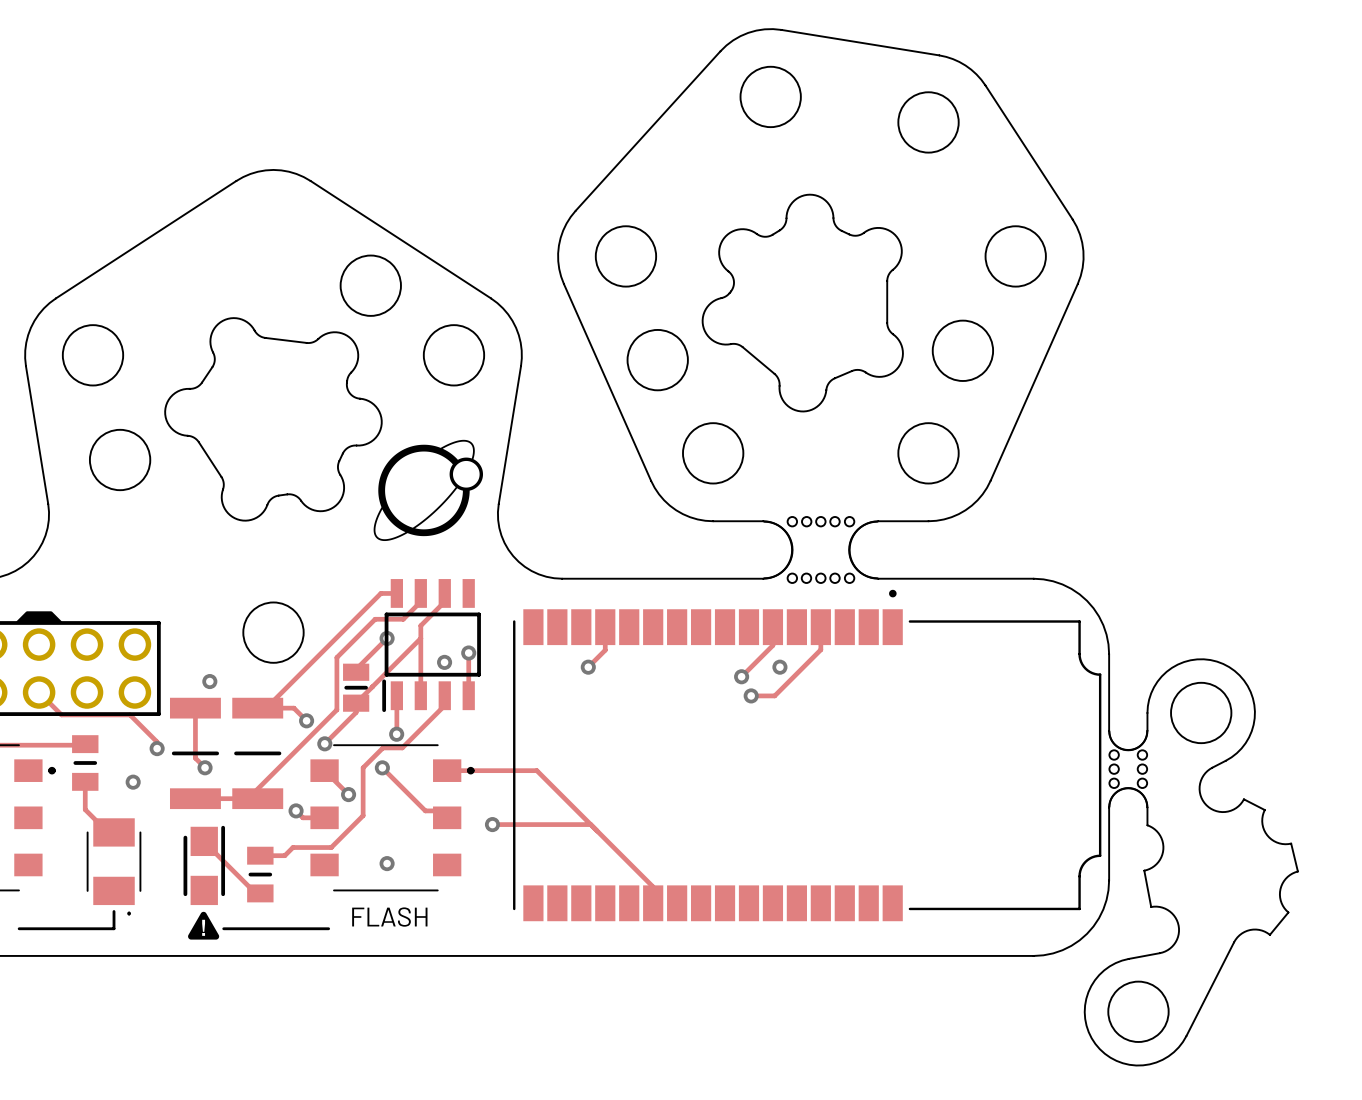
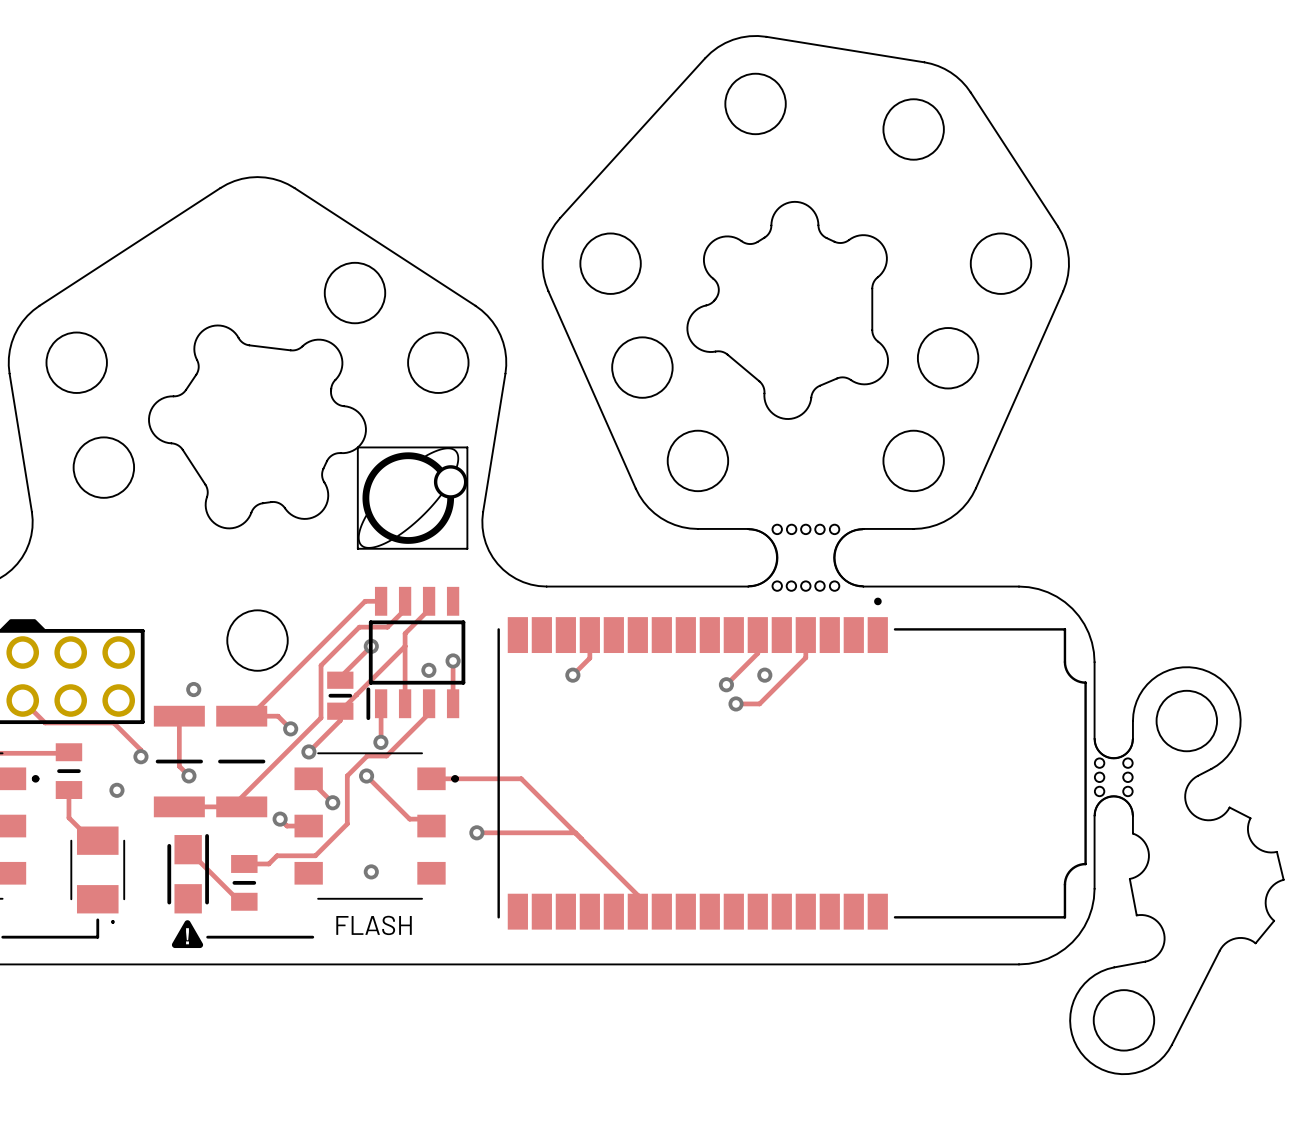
line: none -> (357, 447) (357, 548) (467, 548) (467, 447) (357, 447)

